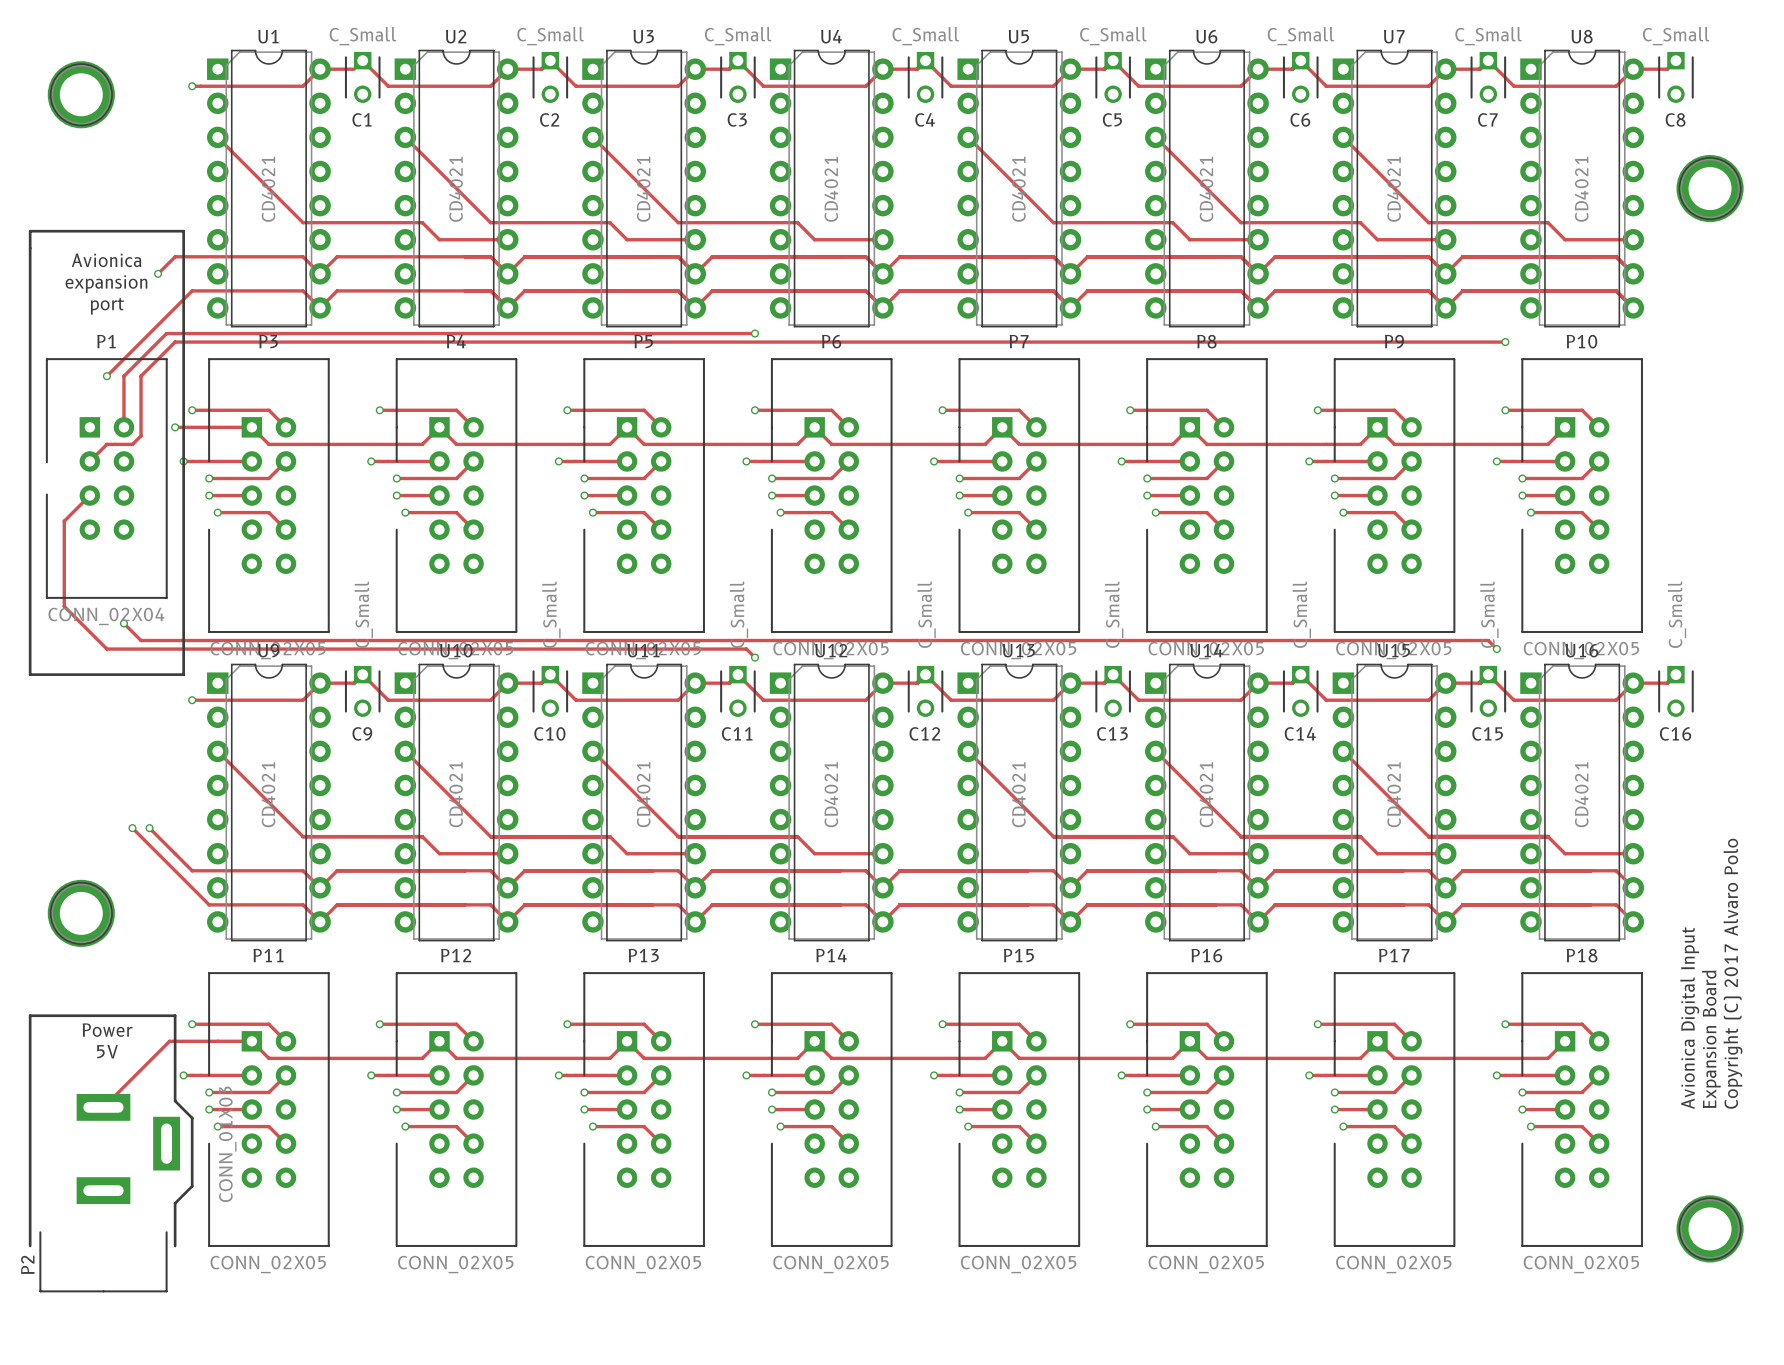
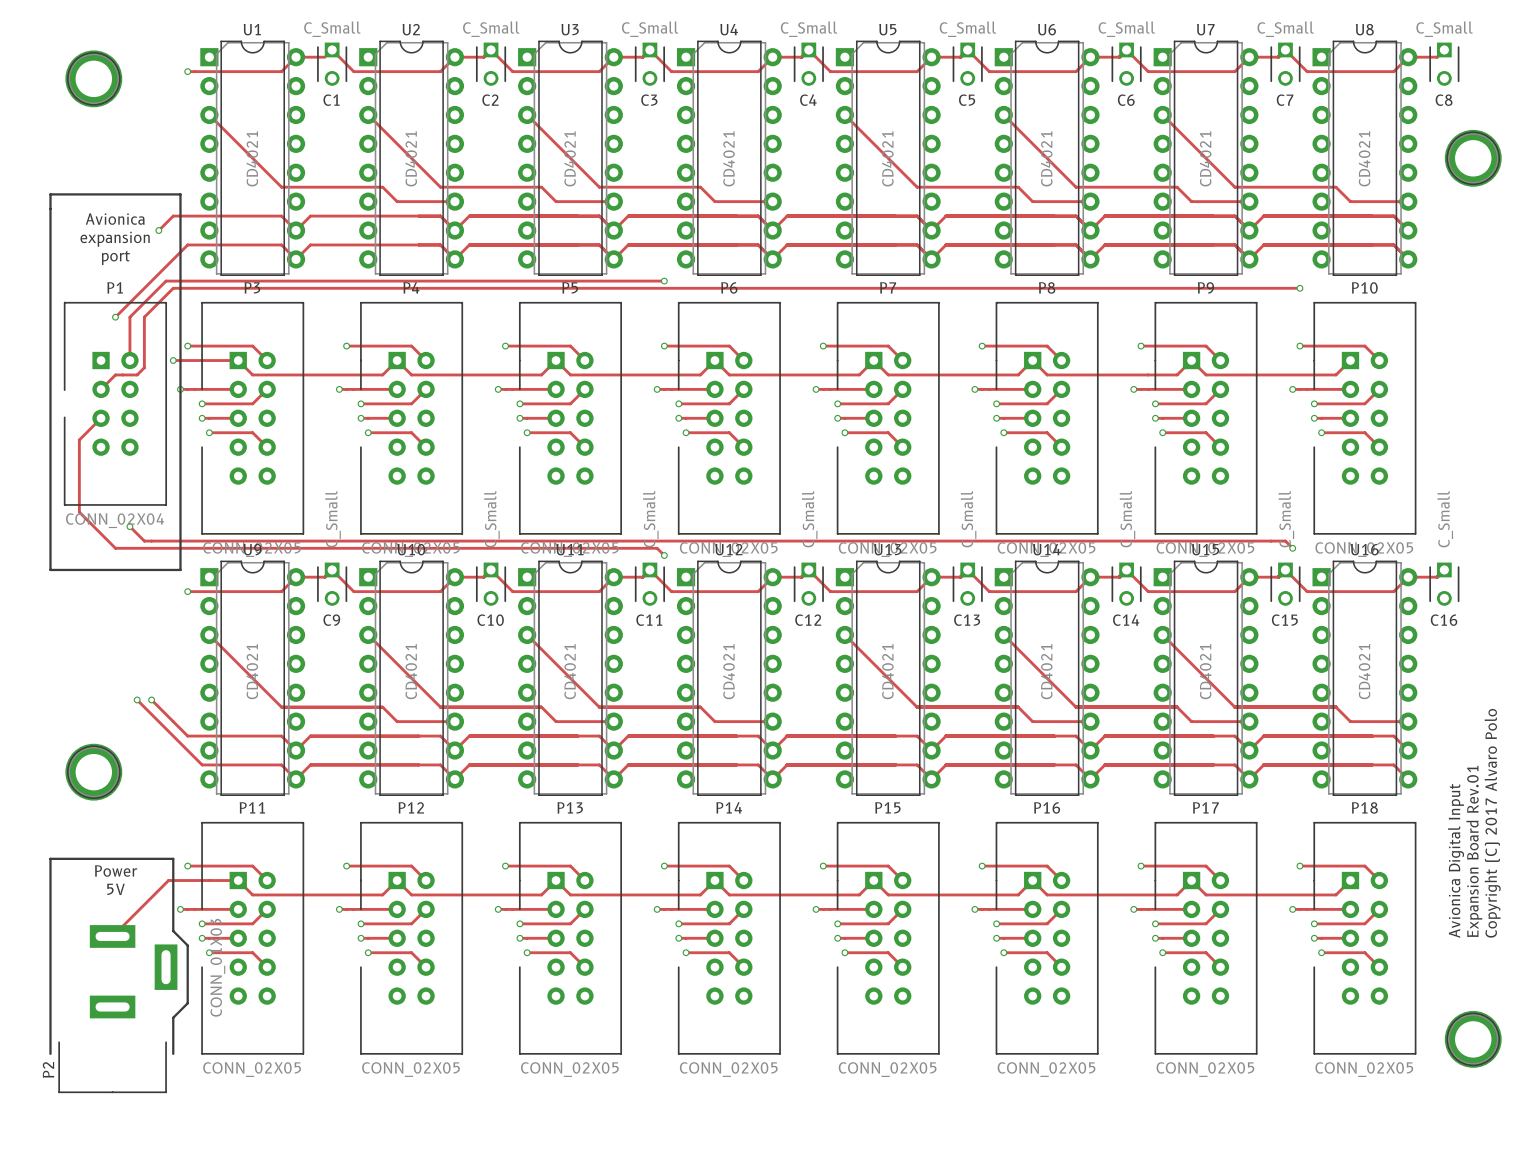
text: Expansion Board (1711, 1039) -> Expansion Board Rev.01 (1474, 851)

